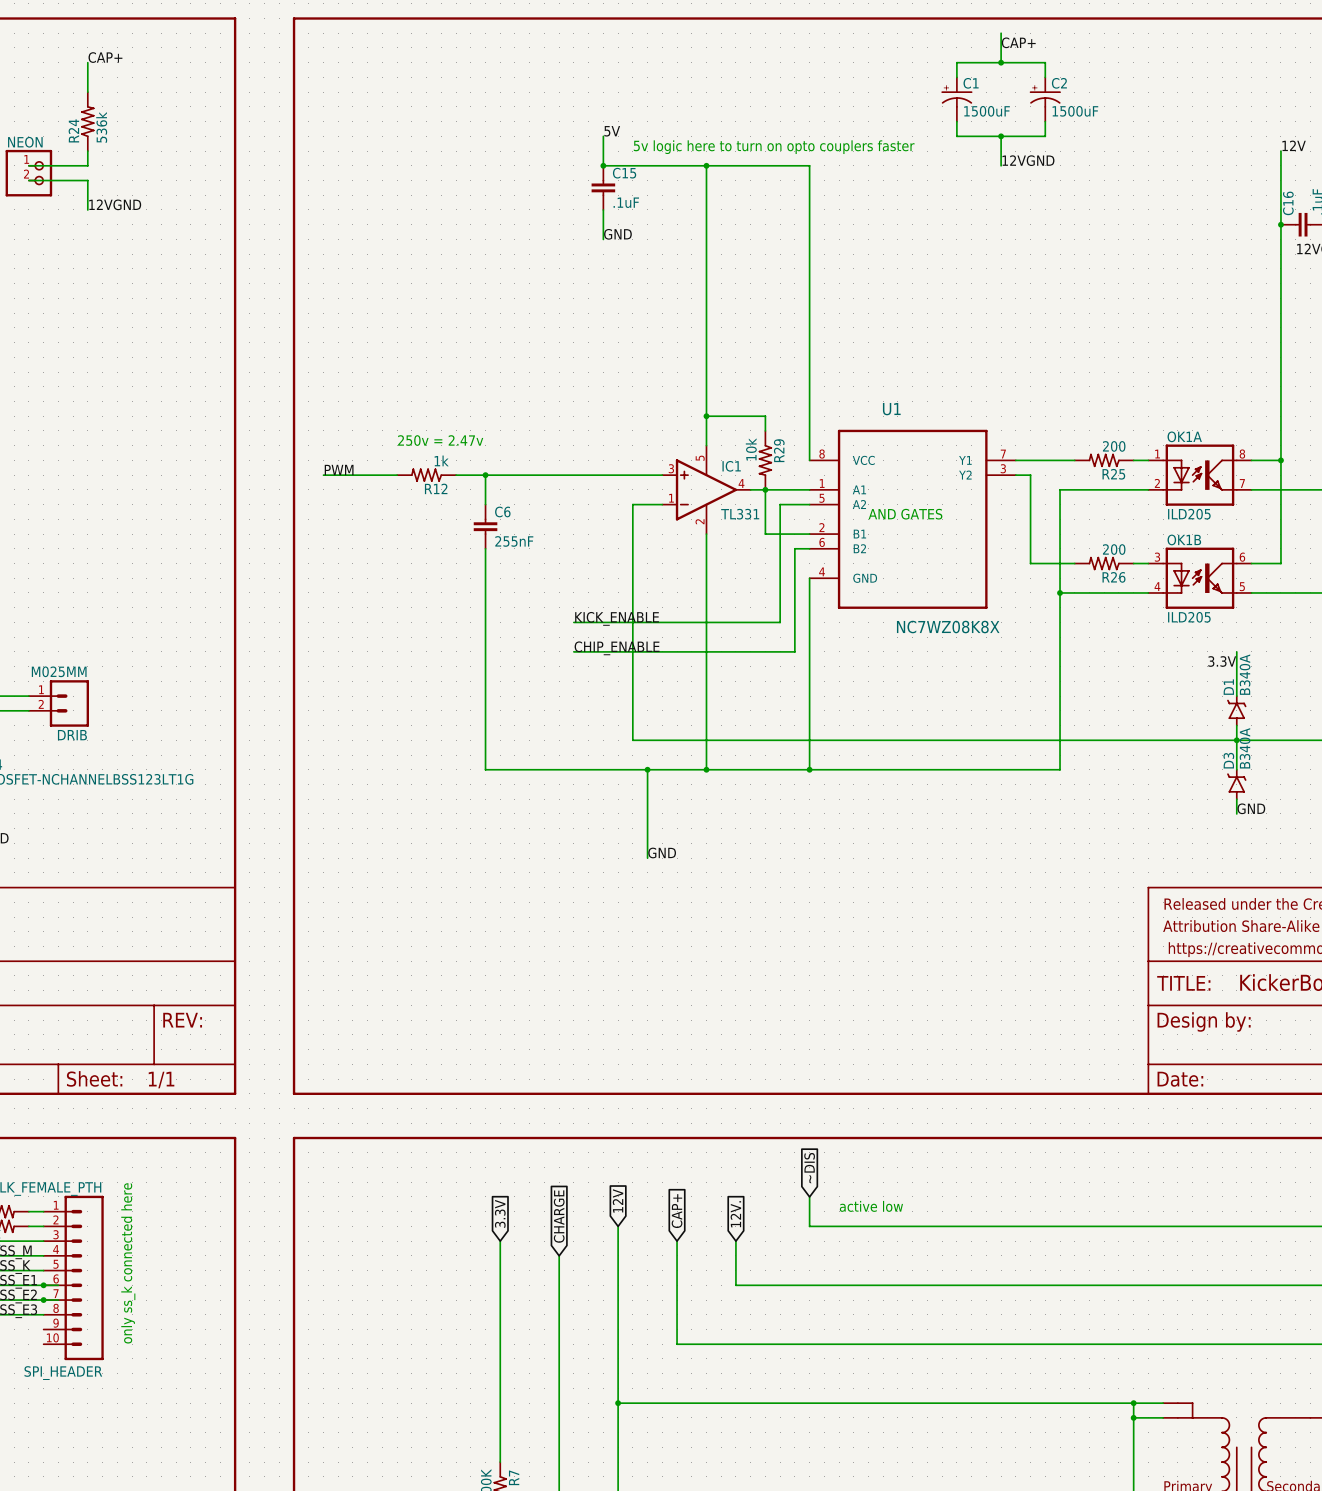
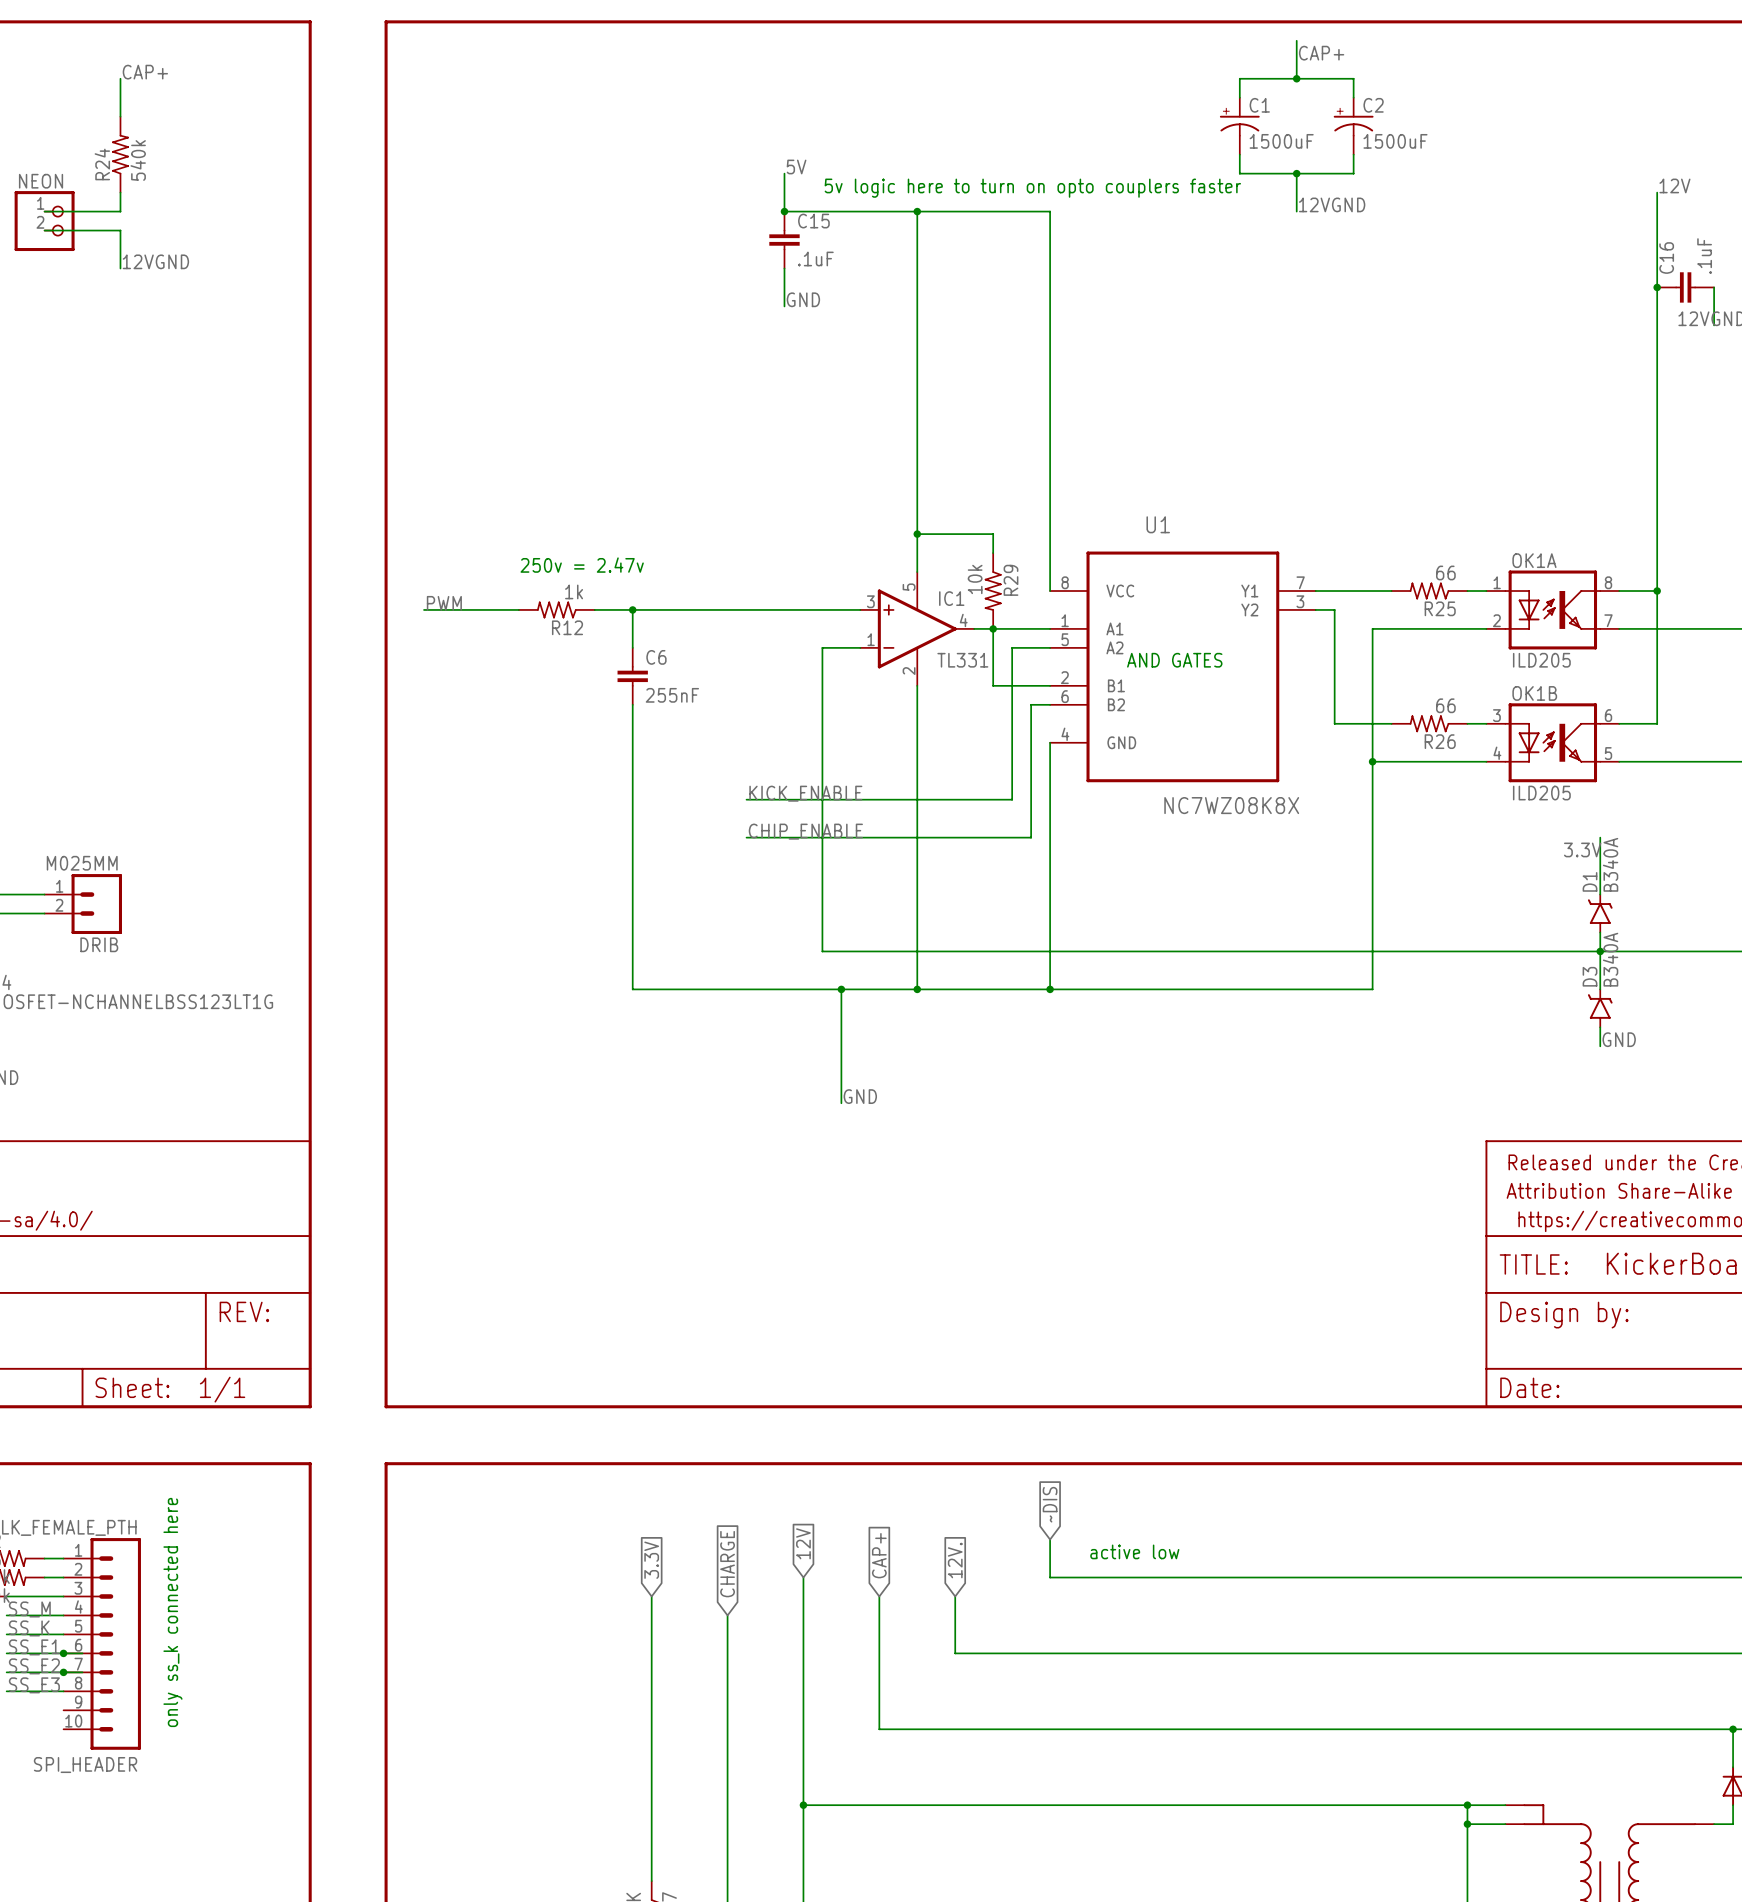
R24 value: 536k (101, 127) -> 540k (138, 160)
R25 value: 200 (1114, 446) -> 66 (1445, 572)
R26 value: 200 (1114, 549) -> 66 (1445, 705)

